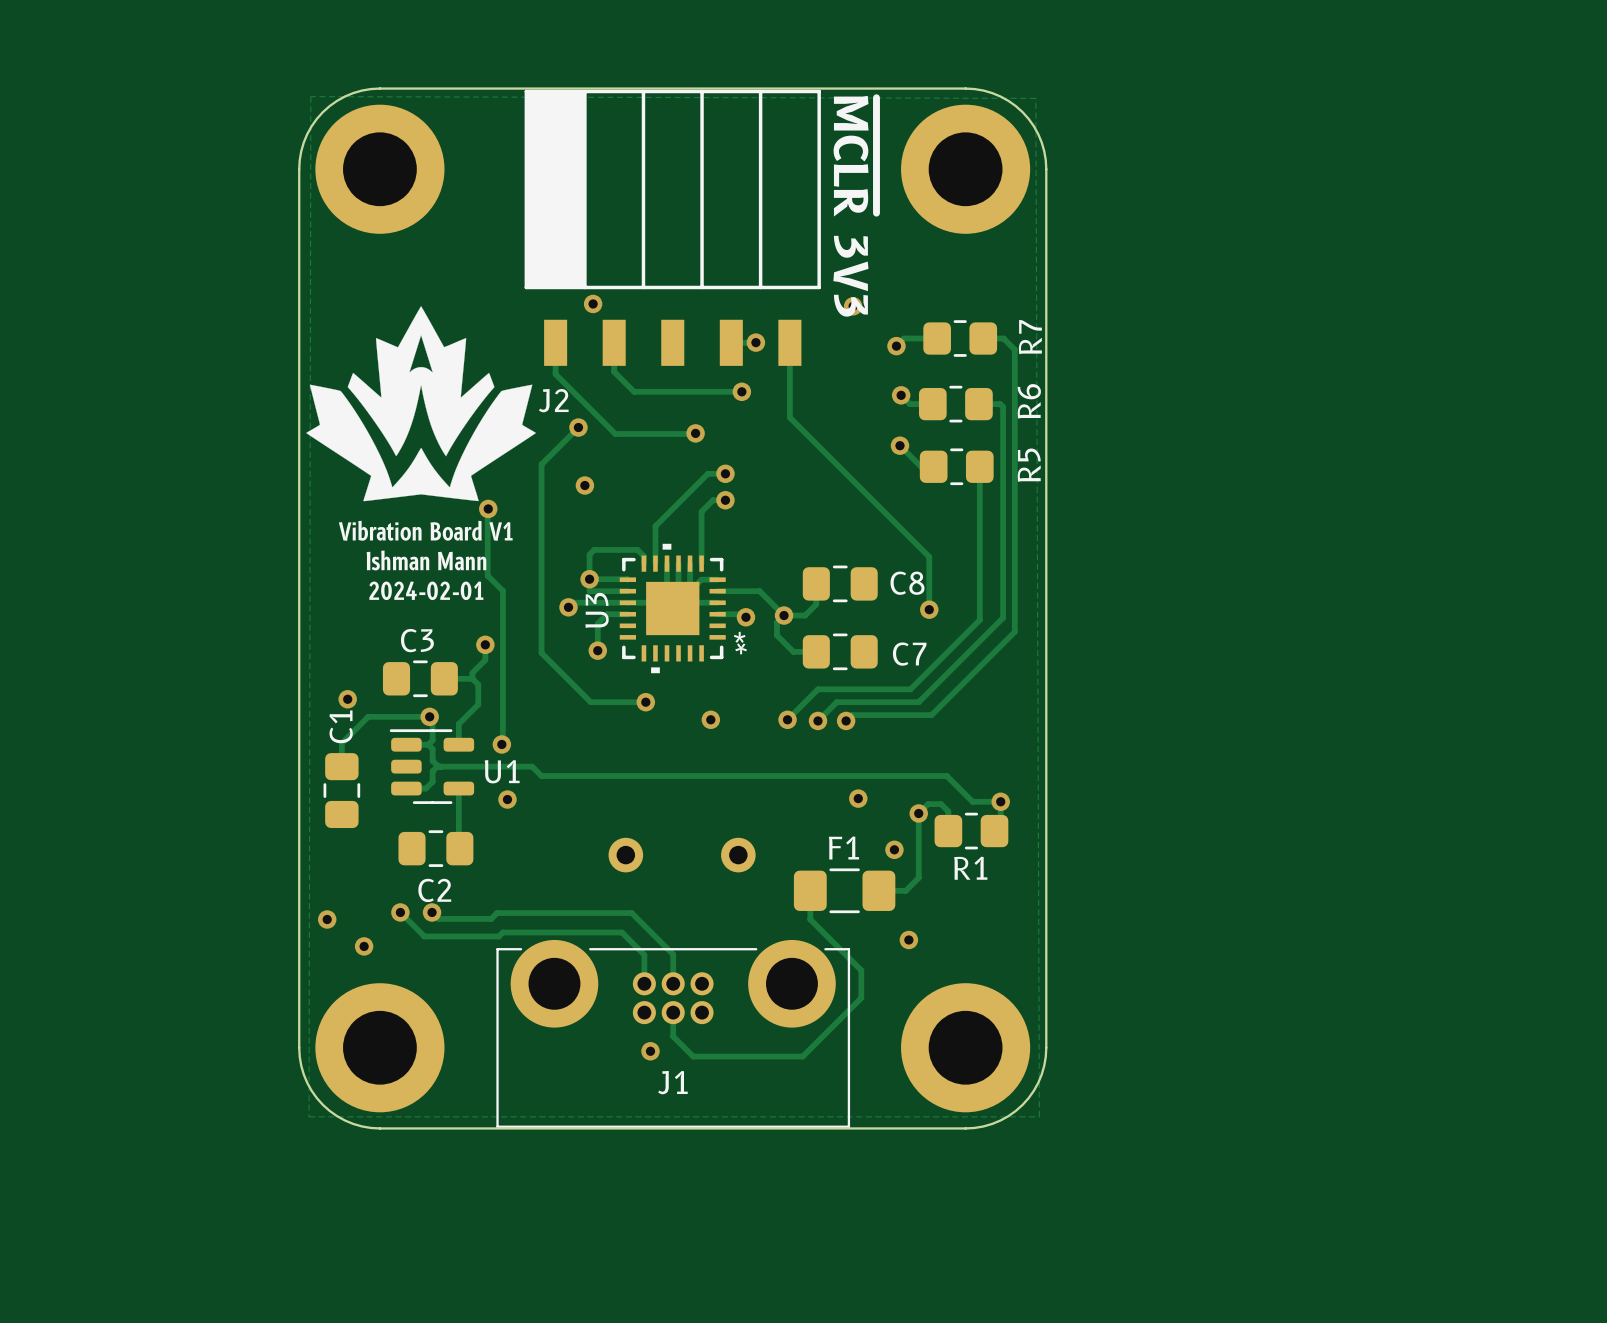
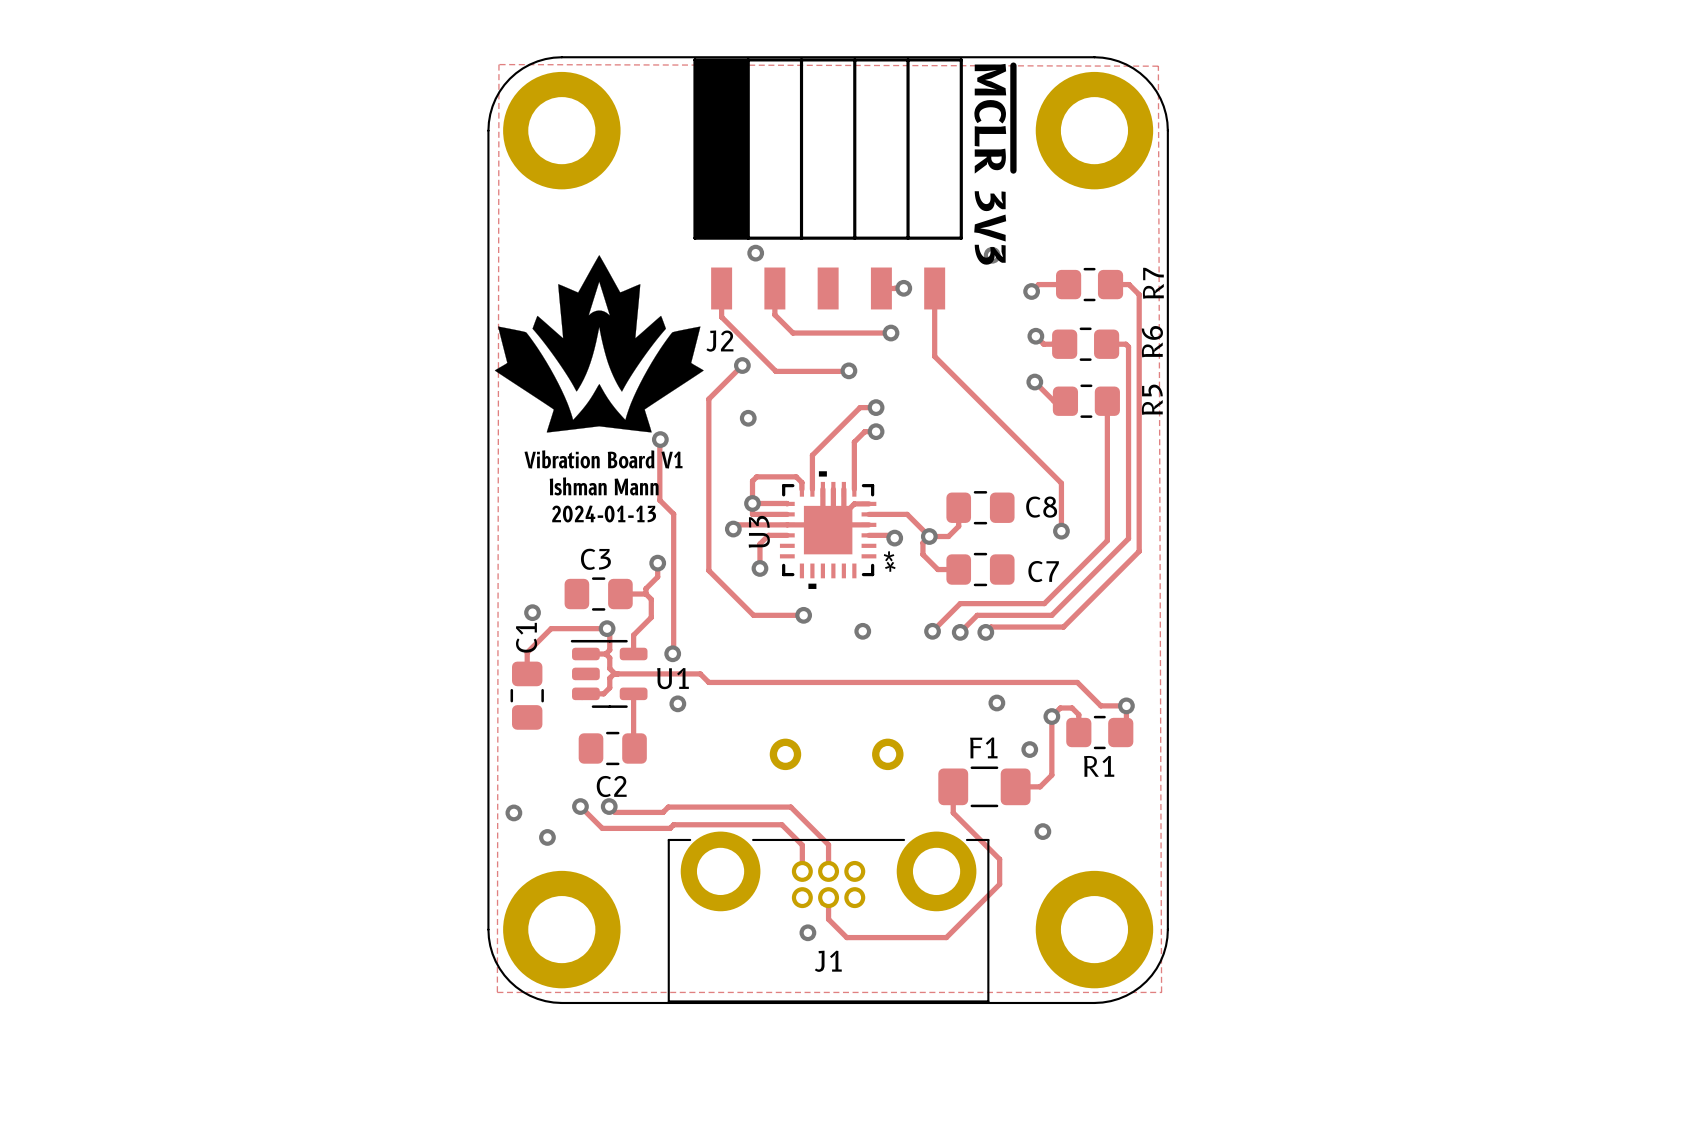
text: 2024-02-01 (426, 590) -> 2024-01-13 (604, 513)

